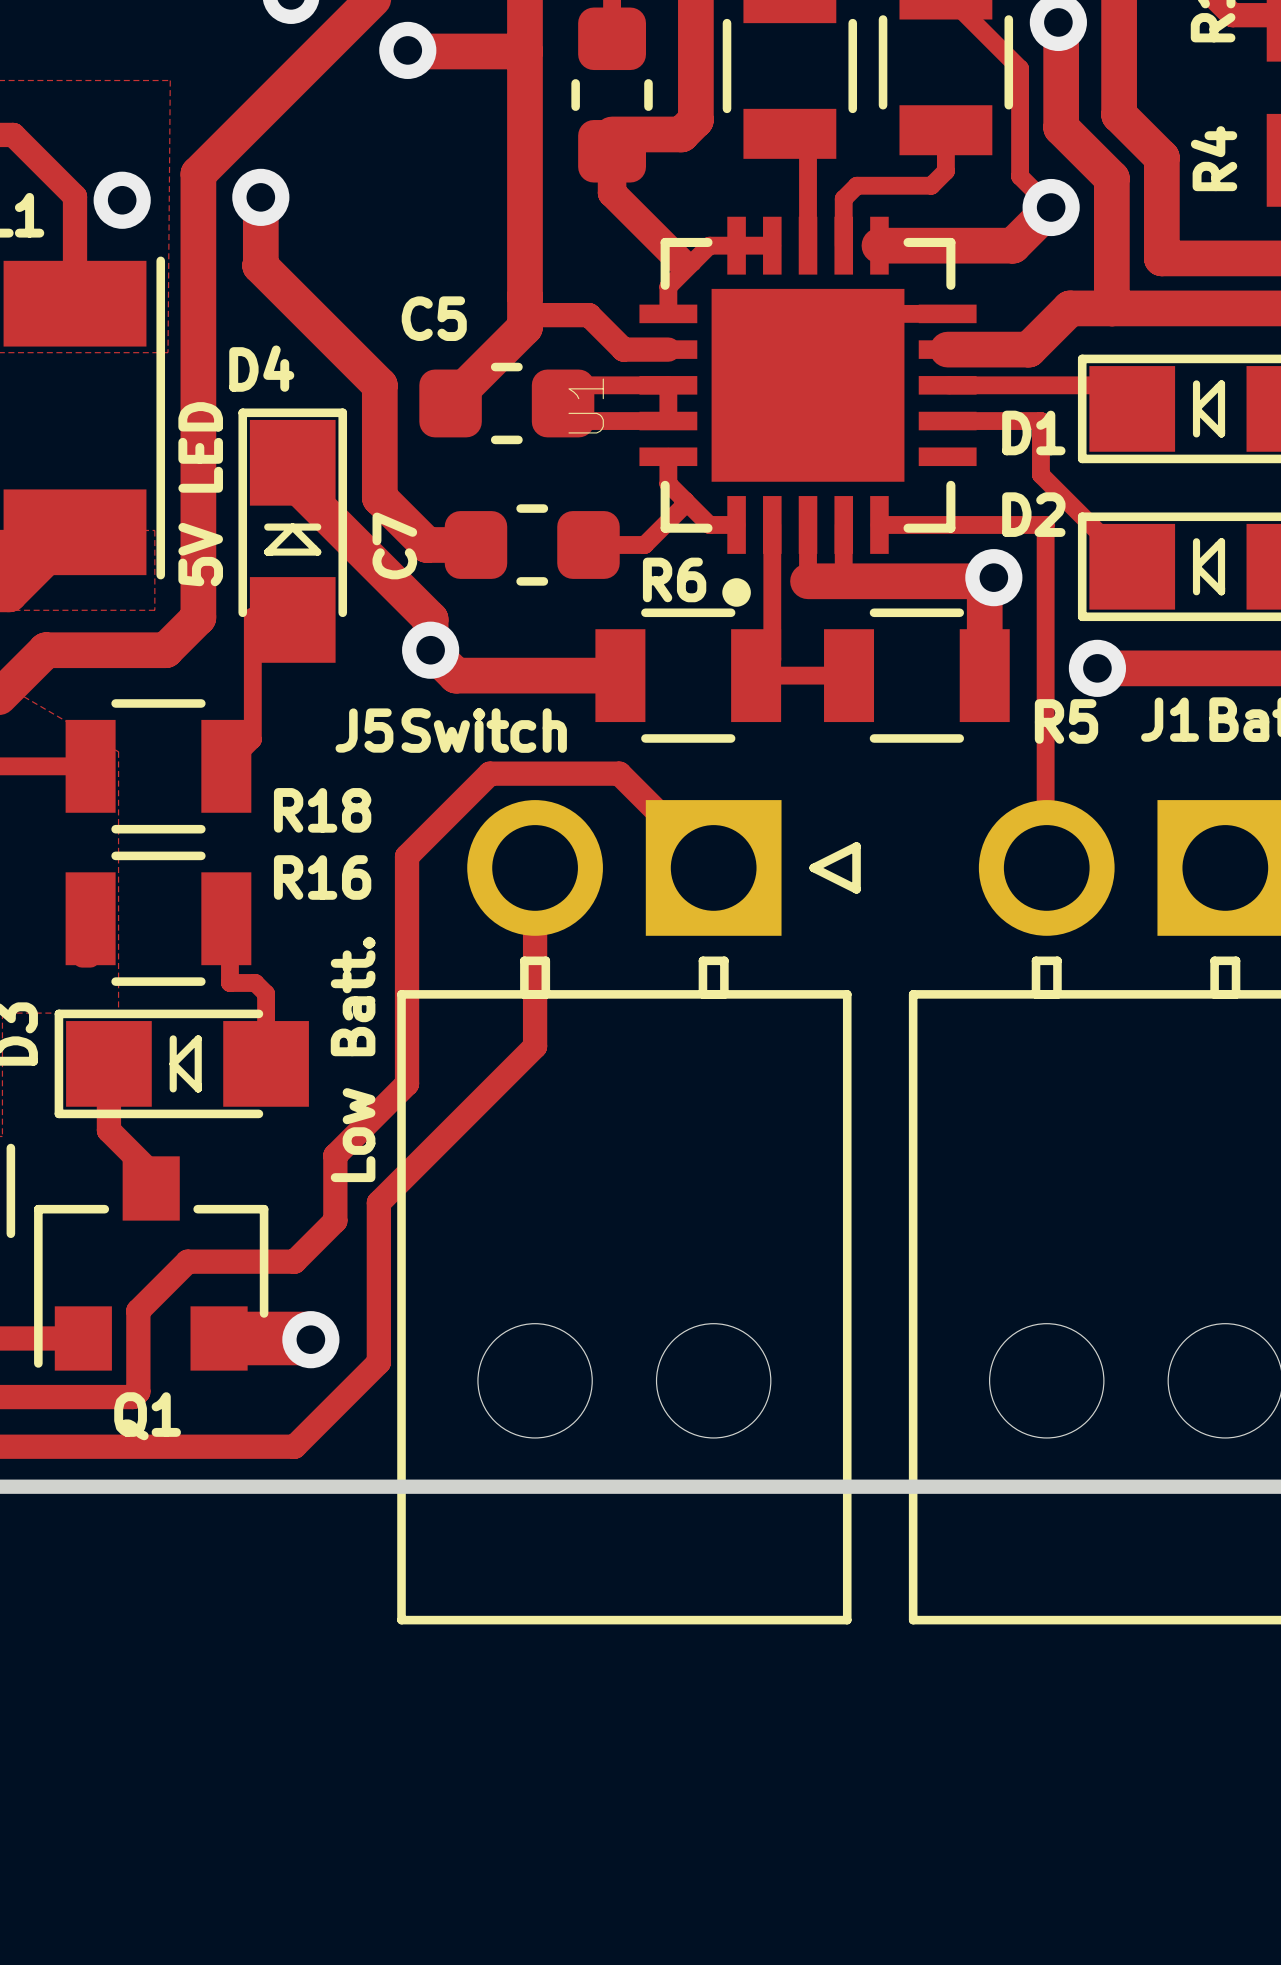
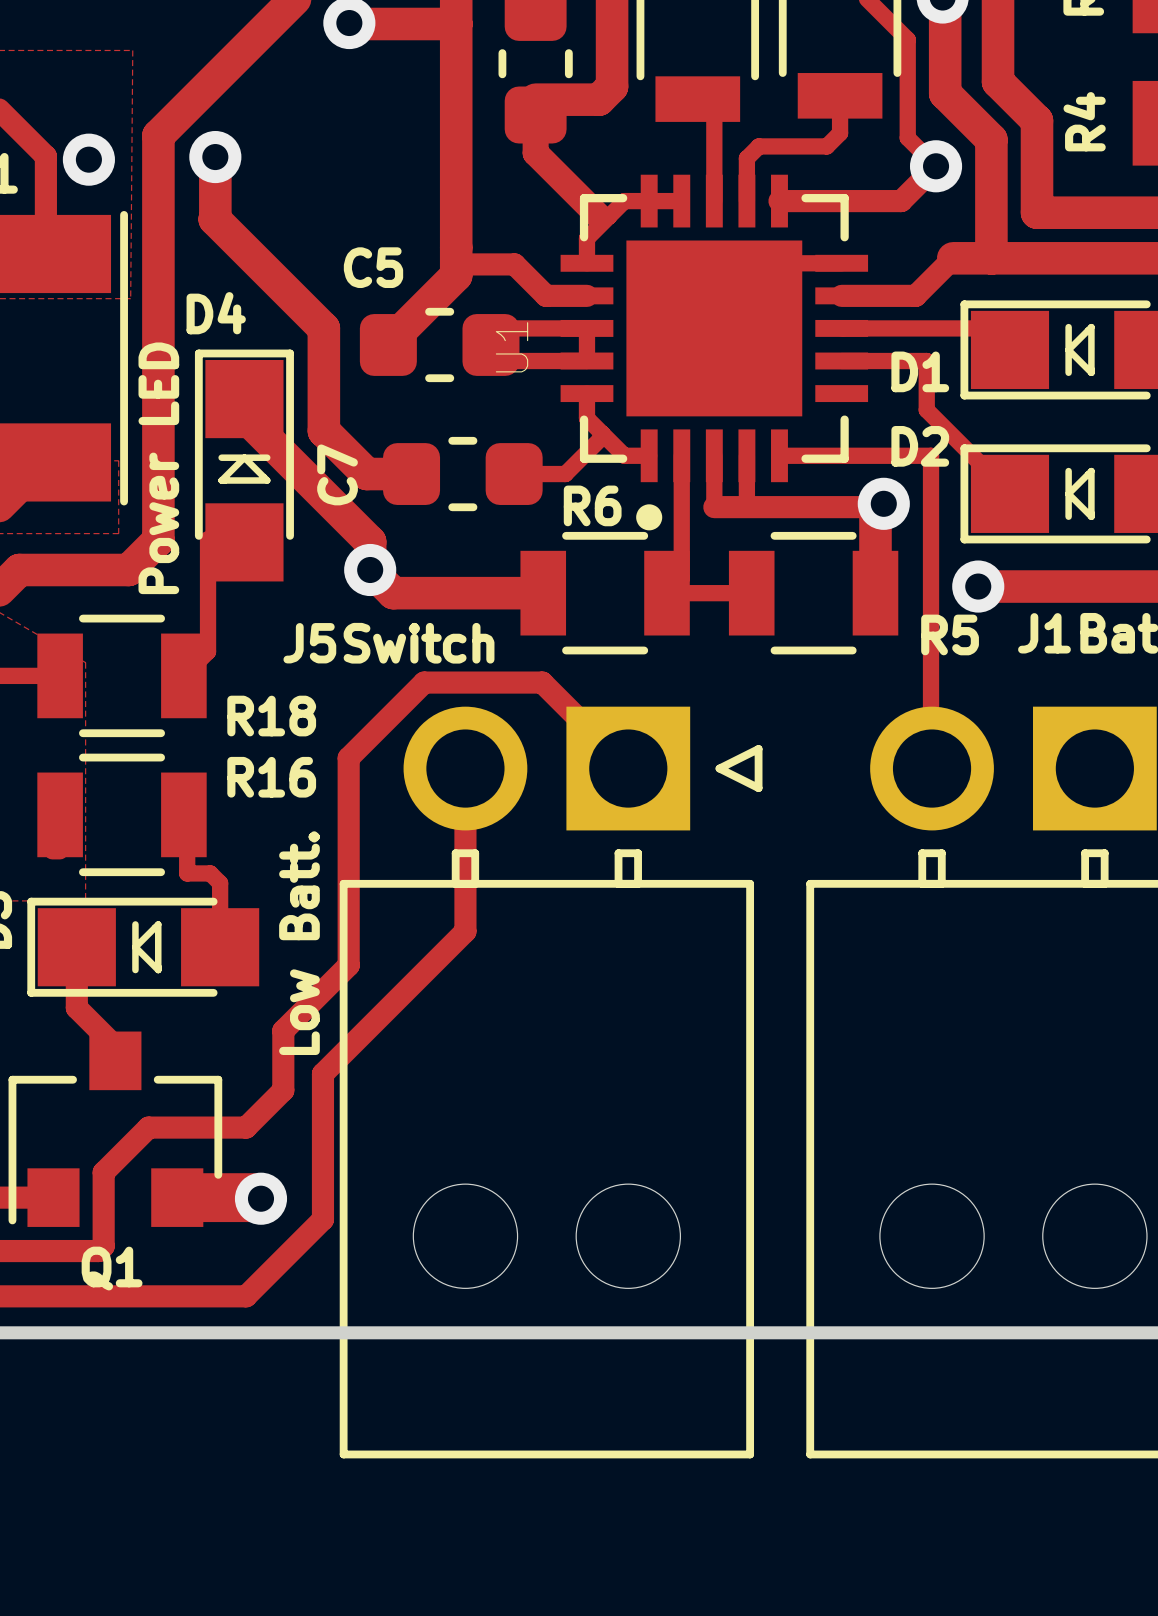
track width: thick (1051, 207) (1012, 245) (879, 245) -> thin (936, 166) (901, 201) (779, 201)
track width: thick (1069, 308) (1028, 349) (947, 349) -> thin (953, 258) (915, 295) (841, 295)
text: 5V LED (200, 494) -> Power LED (158, 468)
track width: thick (808, 581) (990, 581) -> thin (714, 507) (880, 507)

